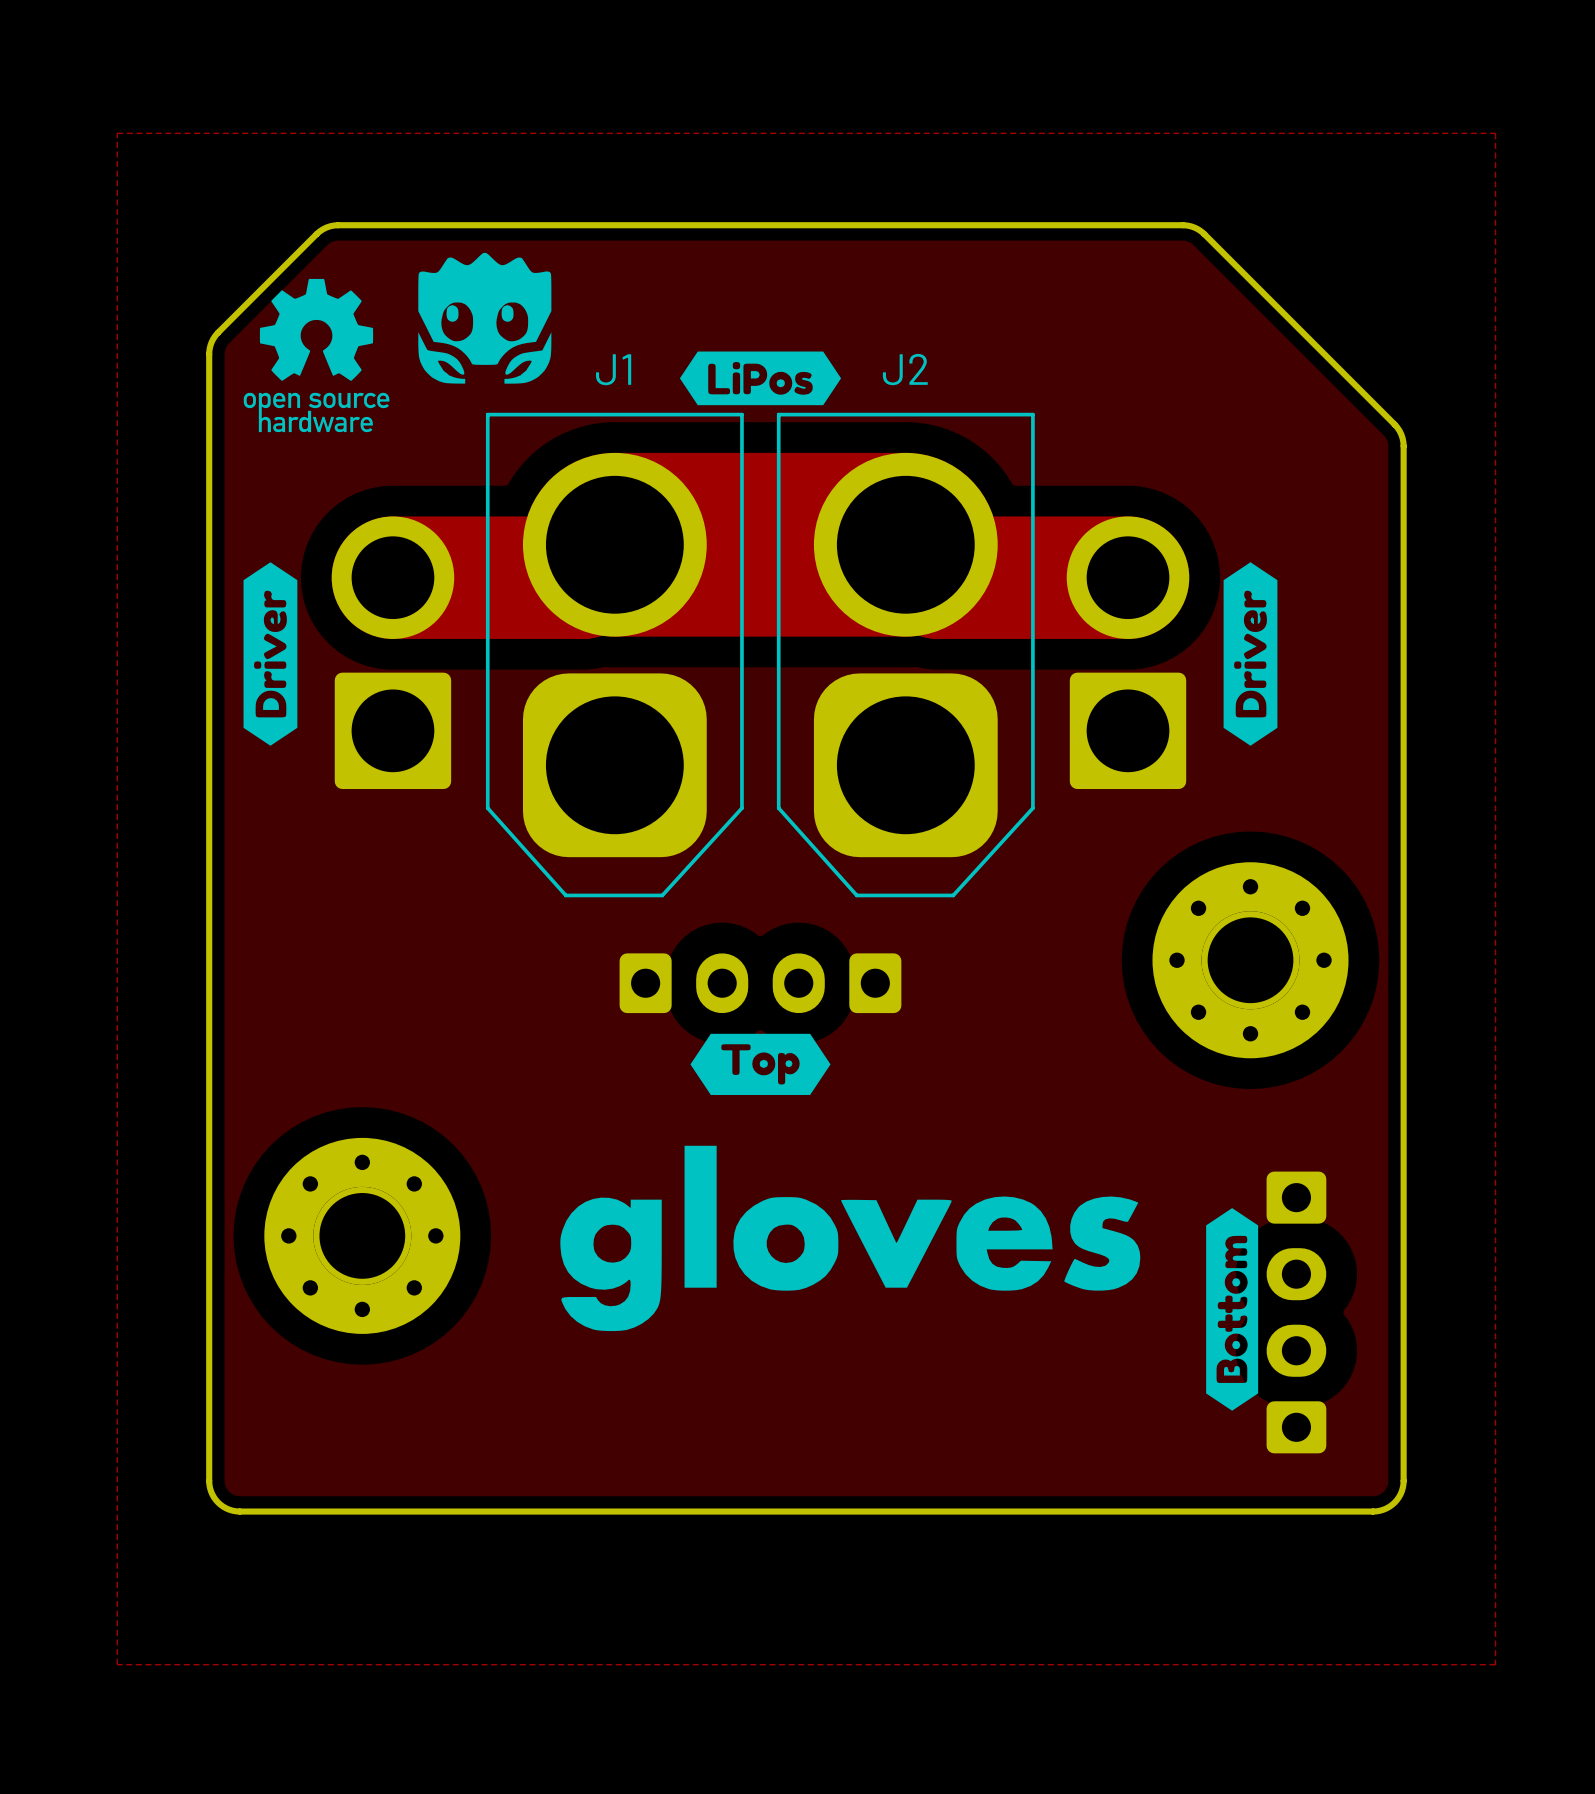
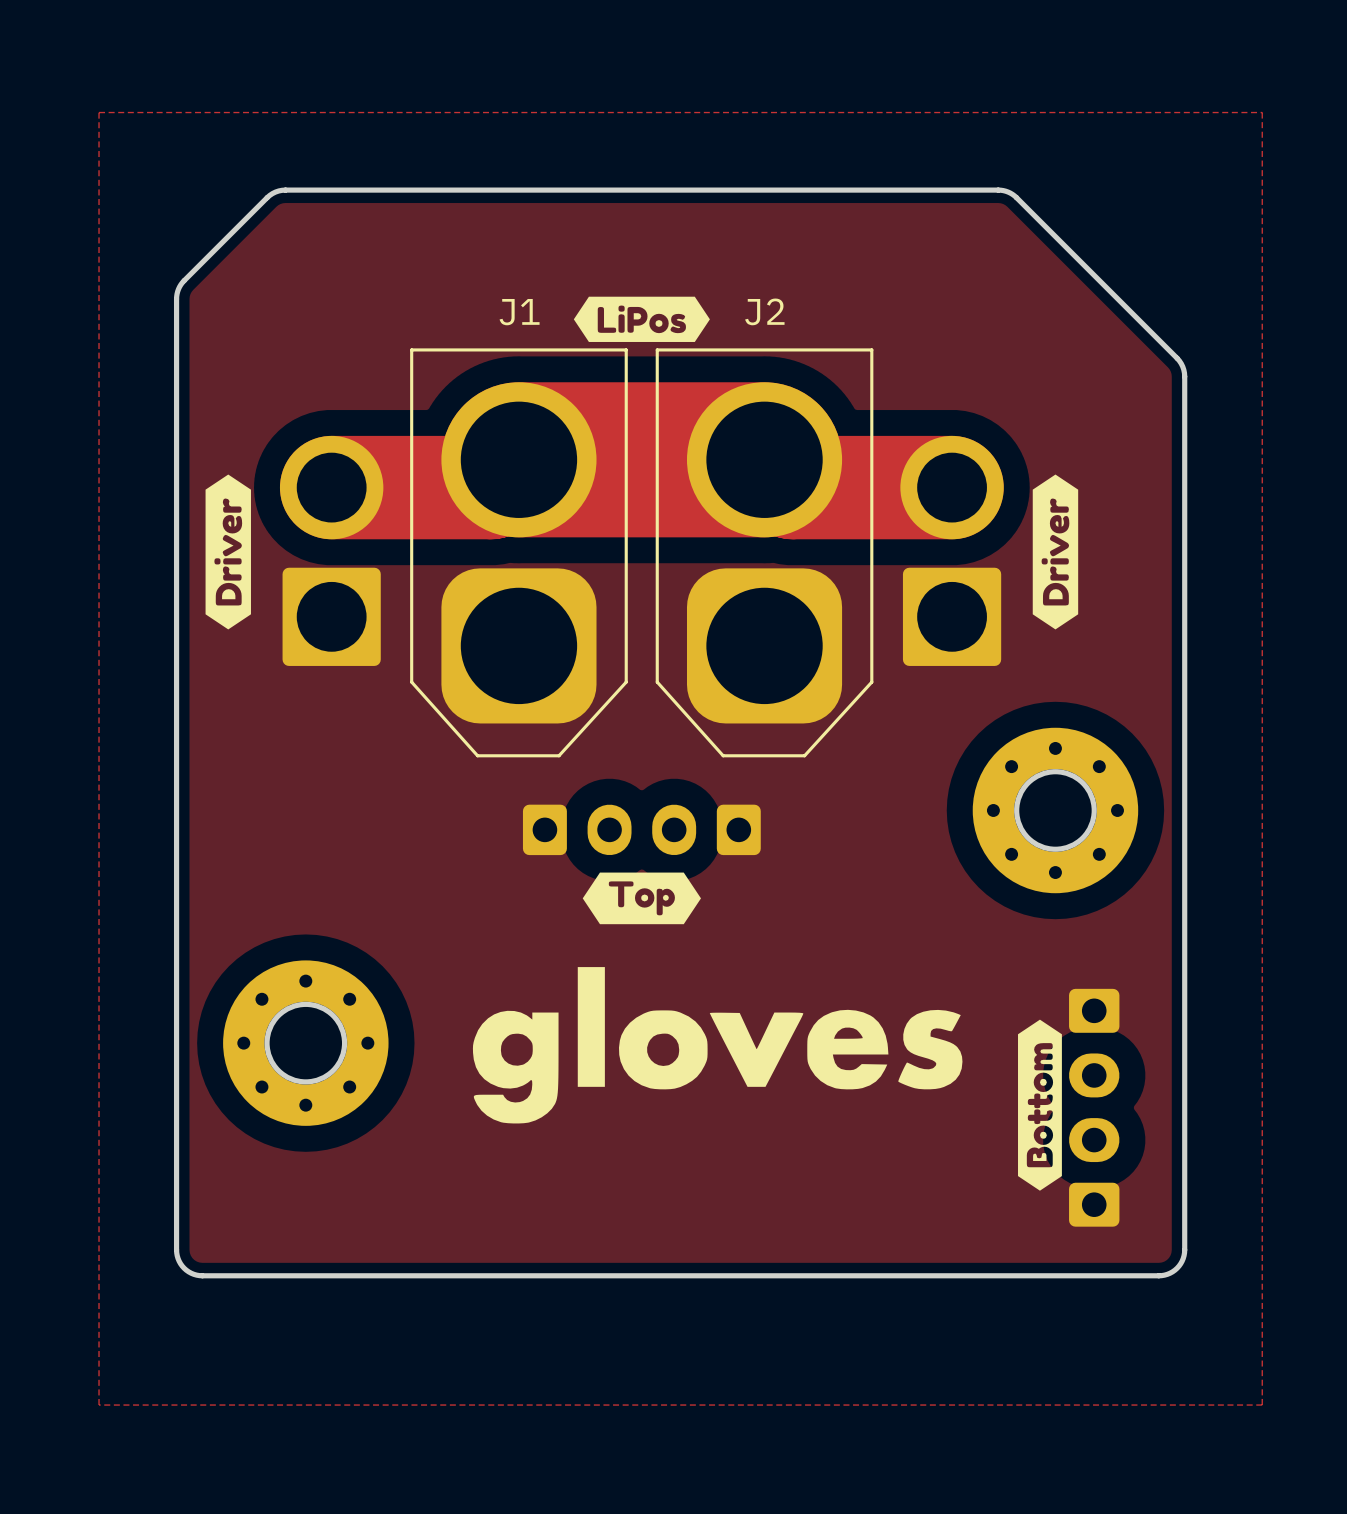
drawing: [243, 252, 552, 433] -> none

